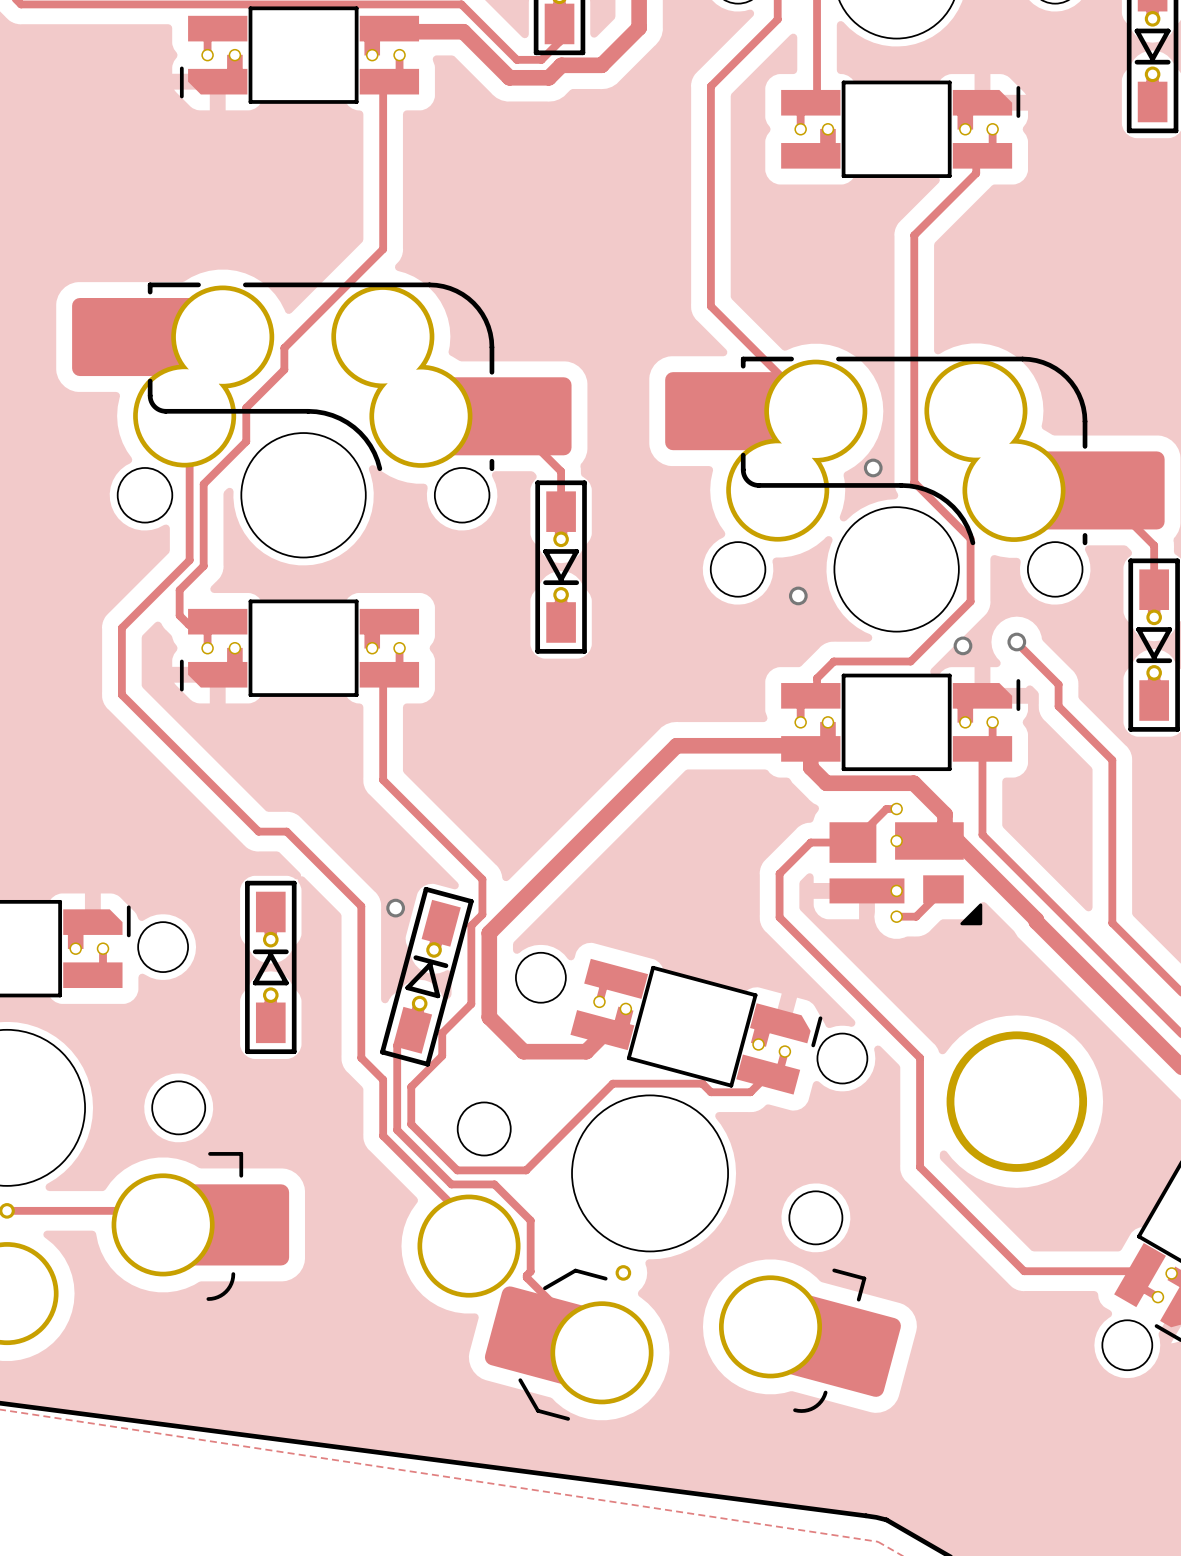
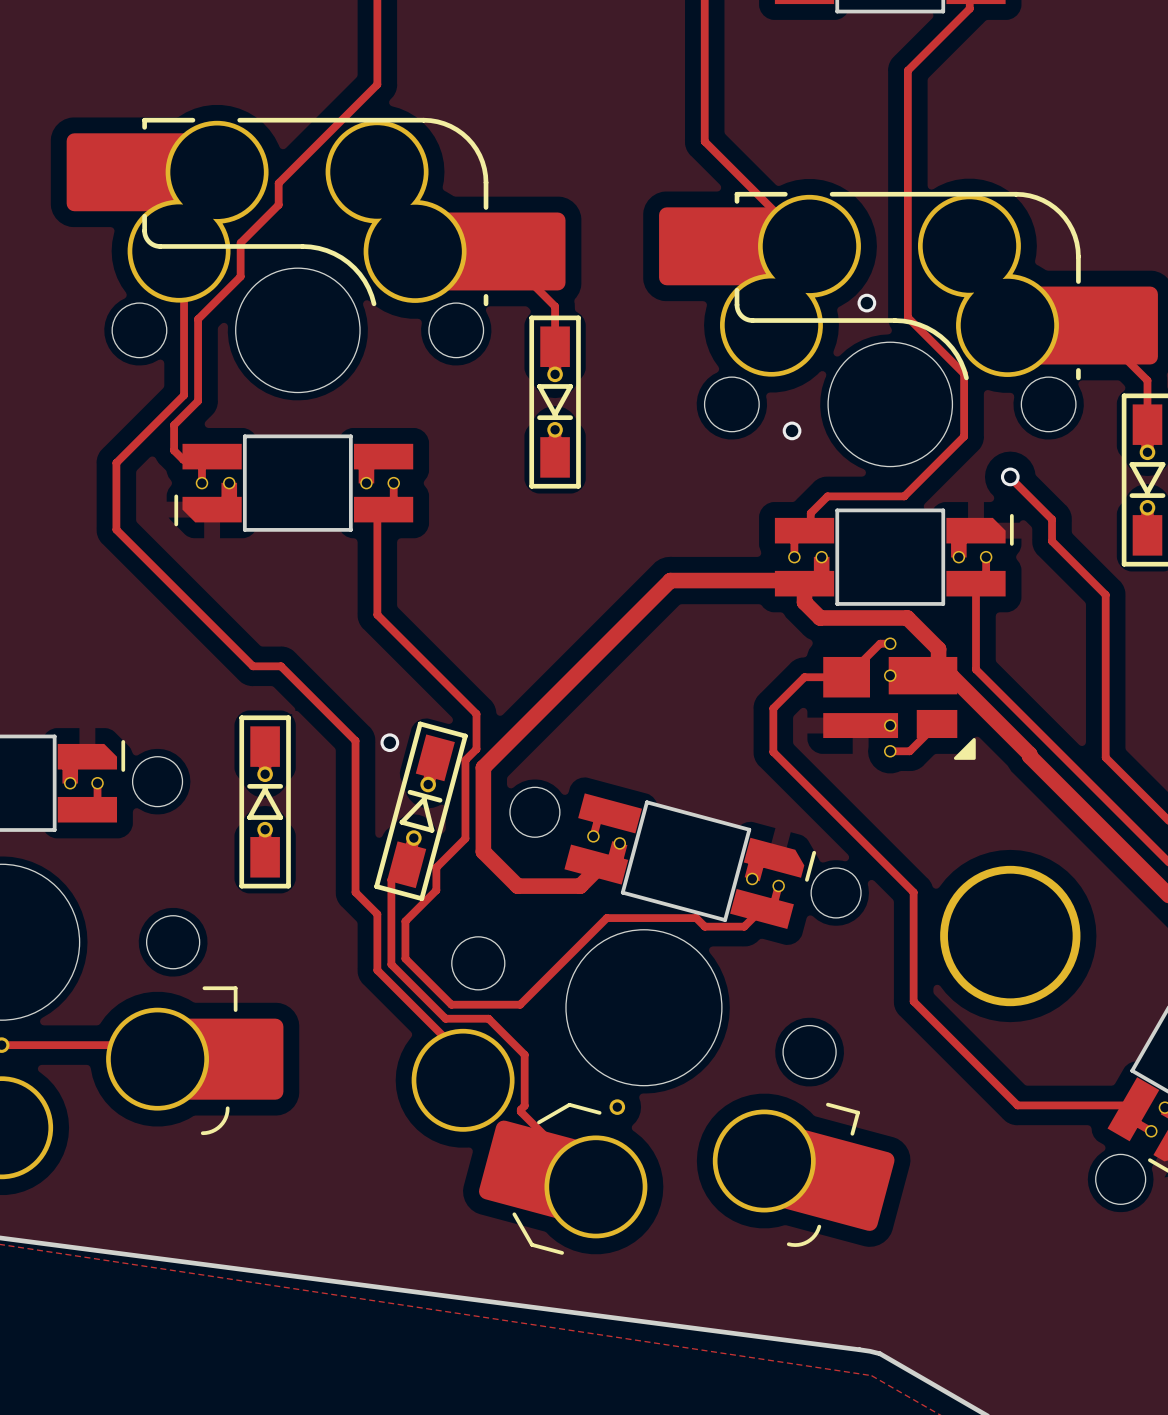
via: (962, 645) -> none

